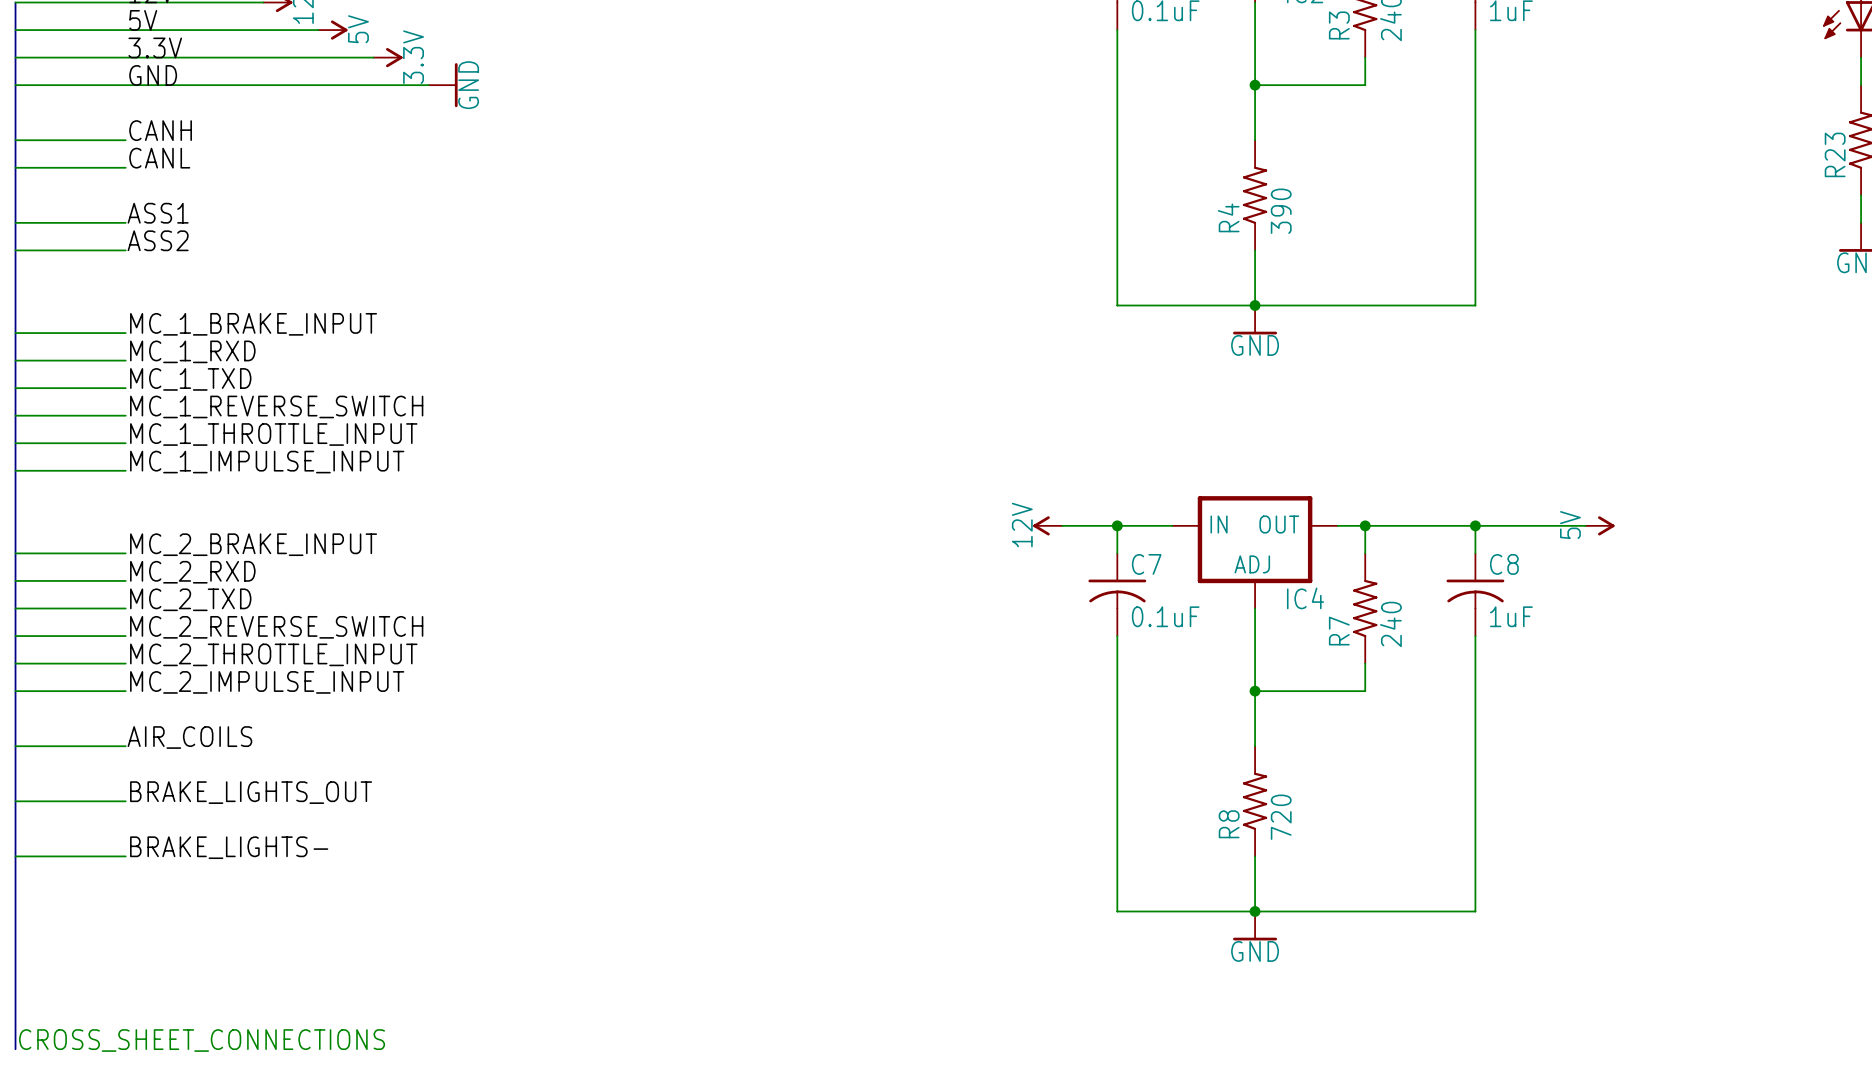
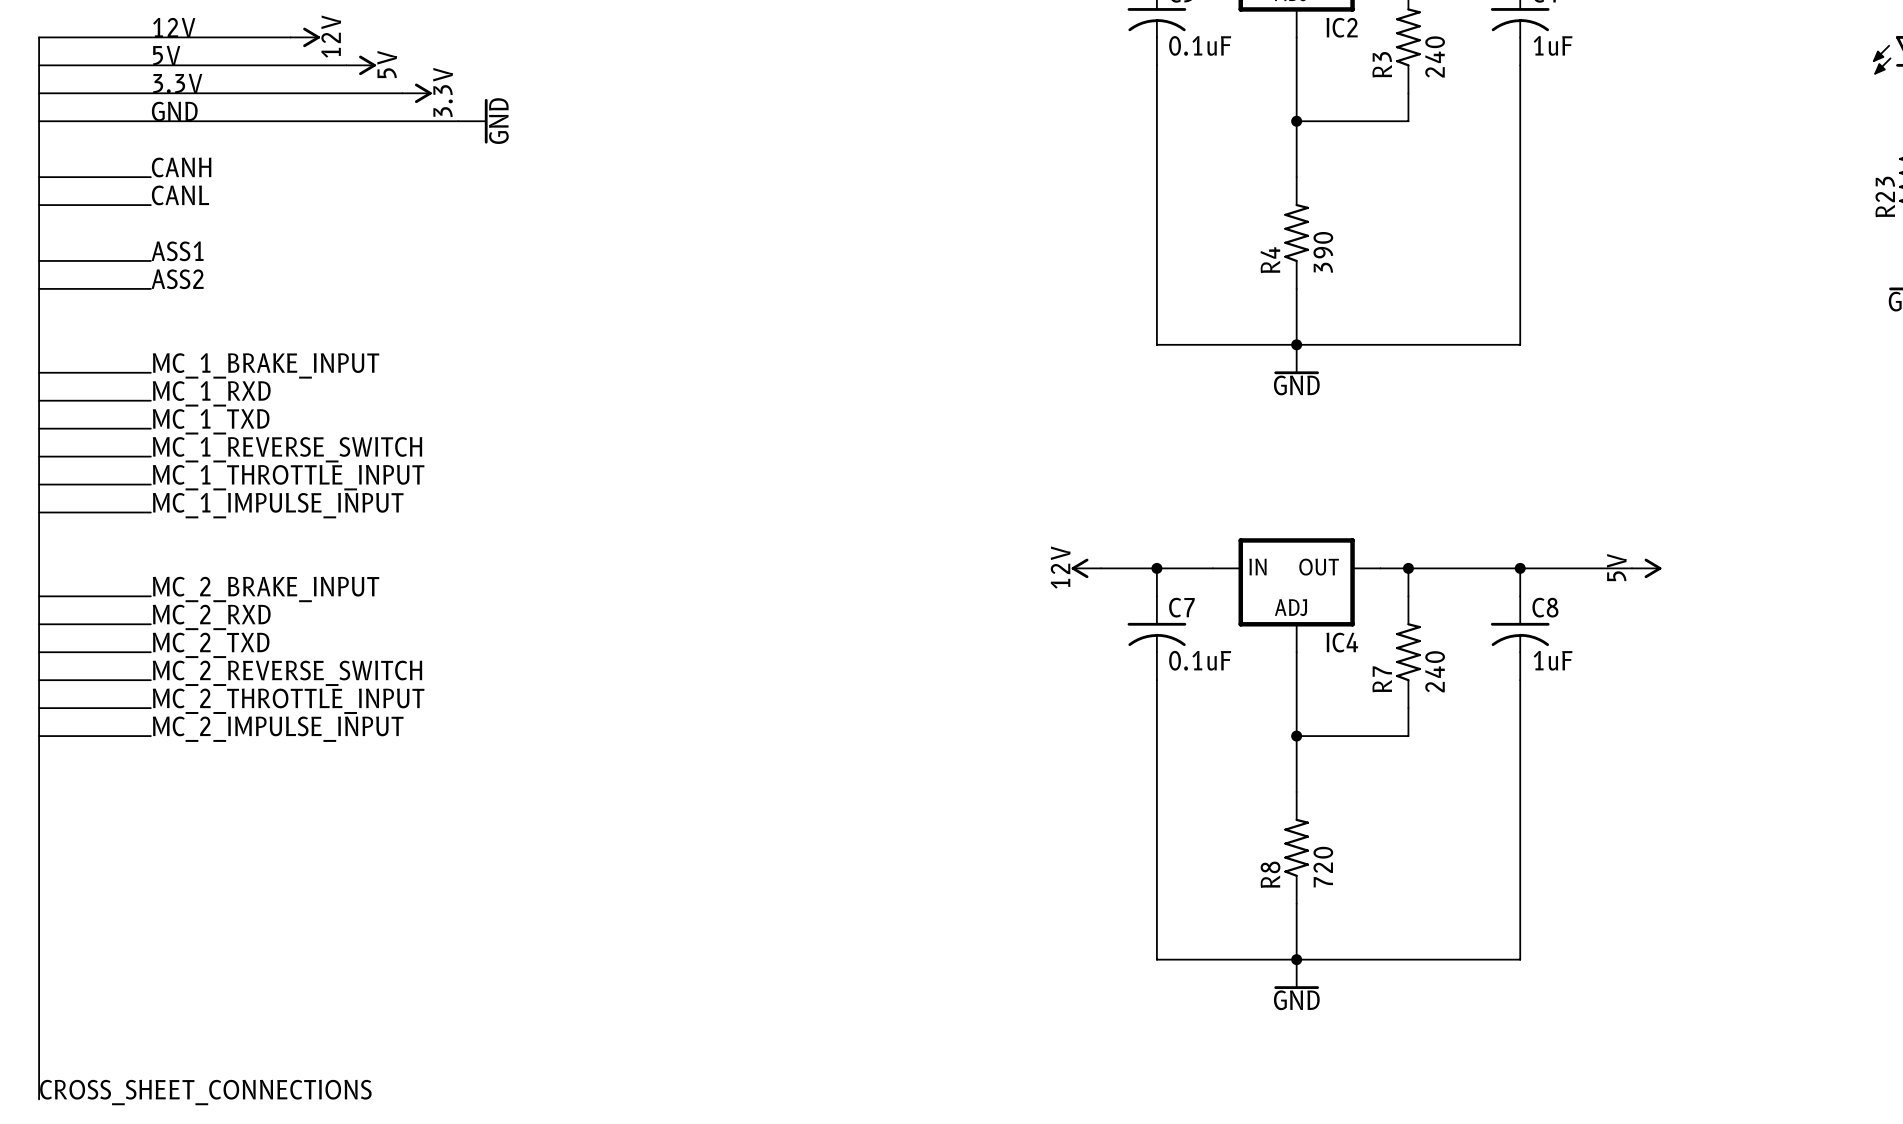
label: AIR_COILS (189, 737) -> none
wire: (15, 746) (125, 746) -> none
label: BRAKE_LIGHTS_OUT (251, 792) -> none
wire: (15, 801) (125, 801) -> none
label: BRAKE_LIGHTS- (229, 847) -> none
wire: (15, 856) (125, 856) -> none

